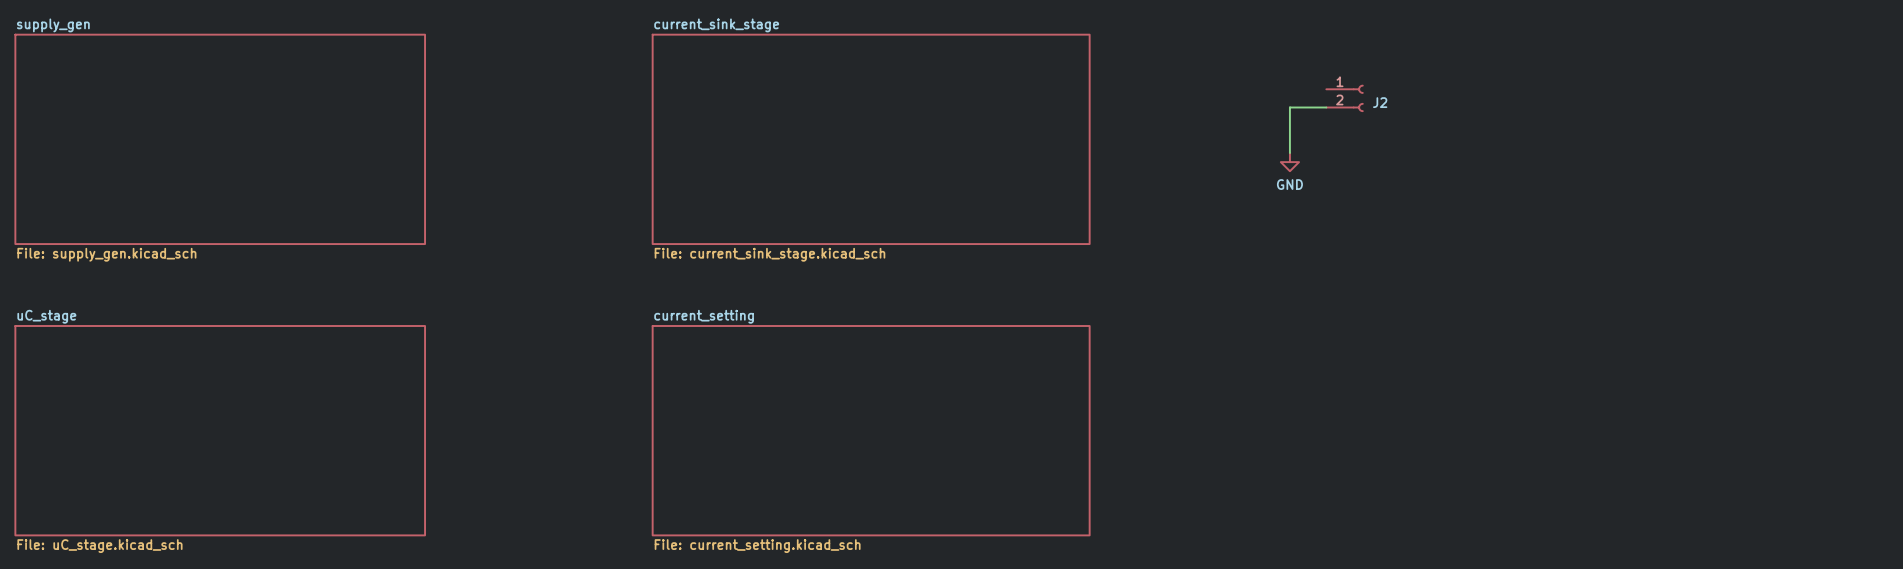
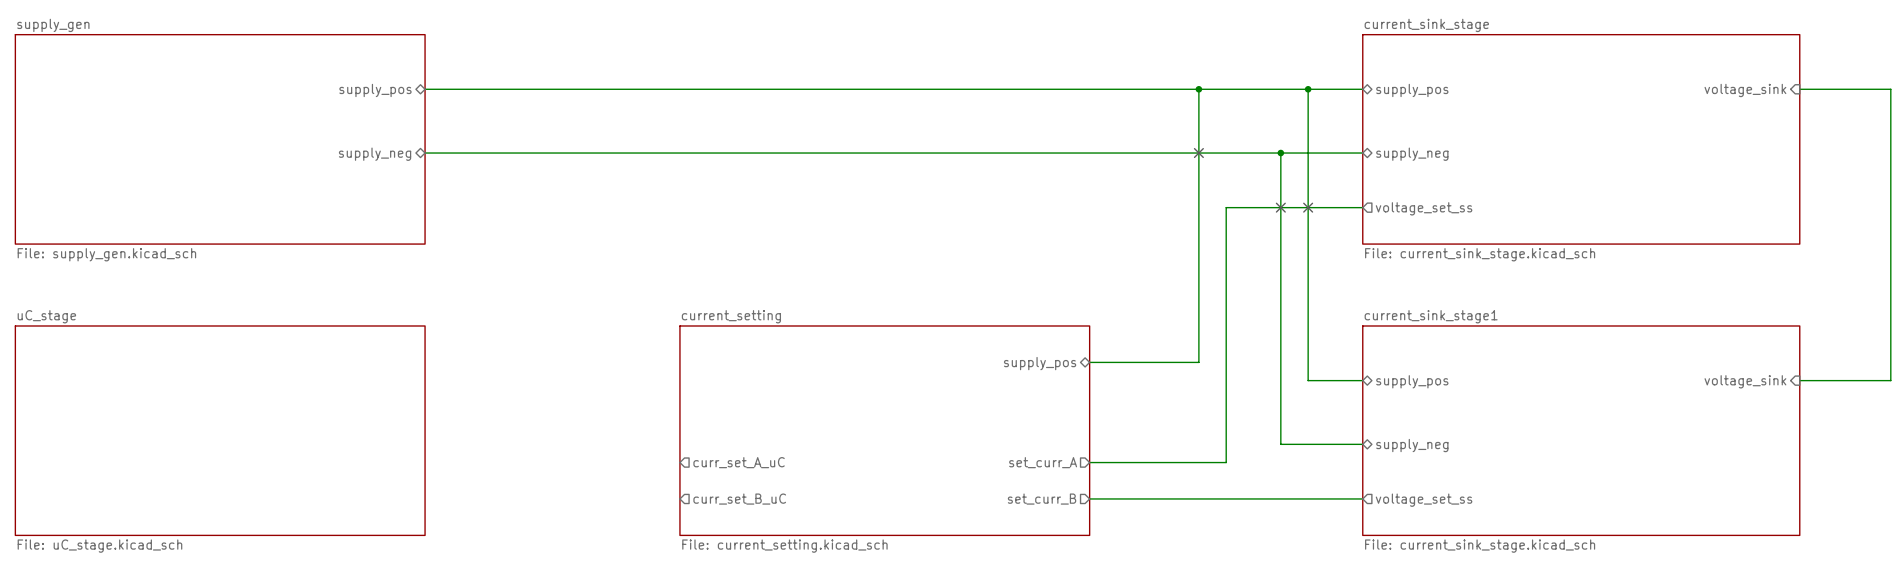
wire: none -> (425, 89) (1362, 89)
wire: none -> (1198, 89) (1198, 362) (1089, 362)
junction: none -> (1198, 89)
wire: none -> (1308, 89) (1308, 380) (1362, 380)
junction: none -> (1308, 89)
wire: none -> (1799, 89) (1890, 89) (1890, 380) (1799, 380)
sheet pin: none -> supply_pos (375, 90)
sheet pin: none -> supply_pos (1412, 90)
sheet pin: none -> voltage_sink (1745, 90)
J2: (1344, 98) -> none
wire: (1326, 107) (1289, 107) (1289, 153) -> none
sheet current_sink_stage: File: current_sink_stage.kicad_sch (871, 139) -> none
sheet current_sink_stage: none -> File: current_sink_stage.kicad_sch (1581, 139)
wire: none -> (425, 153) (1362, 153)
no-connect mark: none -> (1198, 153)
wire: none -> (1280, 153) (1280, 444) (1362, 444)
junction: none -> (1280, 153)
sheet pin: none -> supply_neg (375, 154)
sheet pin: none -> supply_neg (1412, 154)
power symbol: GND (1289, 162) -> none
no-connect mark: none -> (1280, 207)
no-connect mark: none -> (1308, 207)
wire: none -> (1362, 207) (1226, 207) (1226, 462) (1089, 462)
sheet pin: none -> voltage_set_ss (1424, 208)
sheet pin: none -> supply_pos (1040, 363)
sheet pin: none -> supply_pos (1412, 381)
sheet pin: none -> voltage_sink (1745, 381)
sheet current_setting: File: current_setting.kicad_sch (871, 430) -> none
sheet current_setting: none -> File: current_setting.kicad_sch (884, 430)
sheet current_sink_stage1: none -> File: current_sink_stage.kicad_sch (1581, 430)
sheet pin: none -> supply_neg (1412, 445)
sheet pin: none -> curr_set_A_uC (739, 462)
sheet pin: none -> set_curr_A (1043, 462)
wire: none -> (1089, 498) (1362, 498)
sheet pin: none -> curr_set_B_uC (739, 499)
sheet pin: none -> set_curr_B (1042, 499)
sheet pin: none -> voltage_set_ss (1424, 500)

